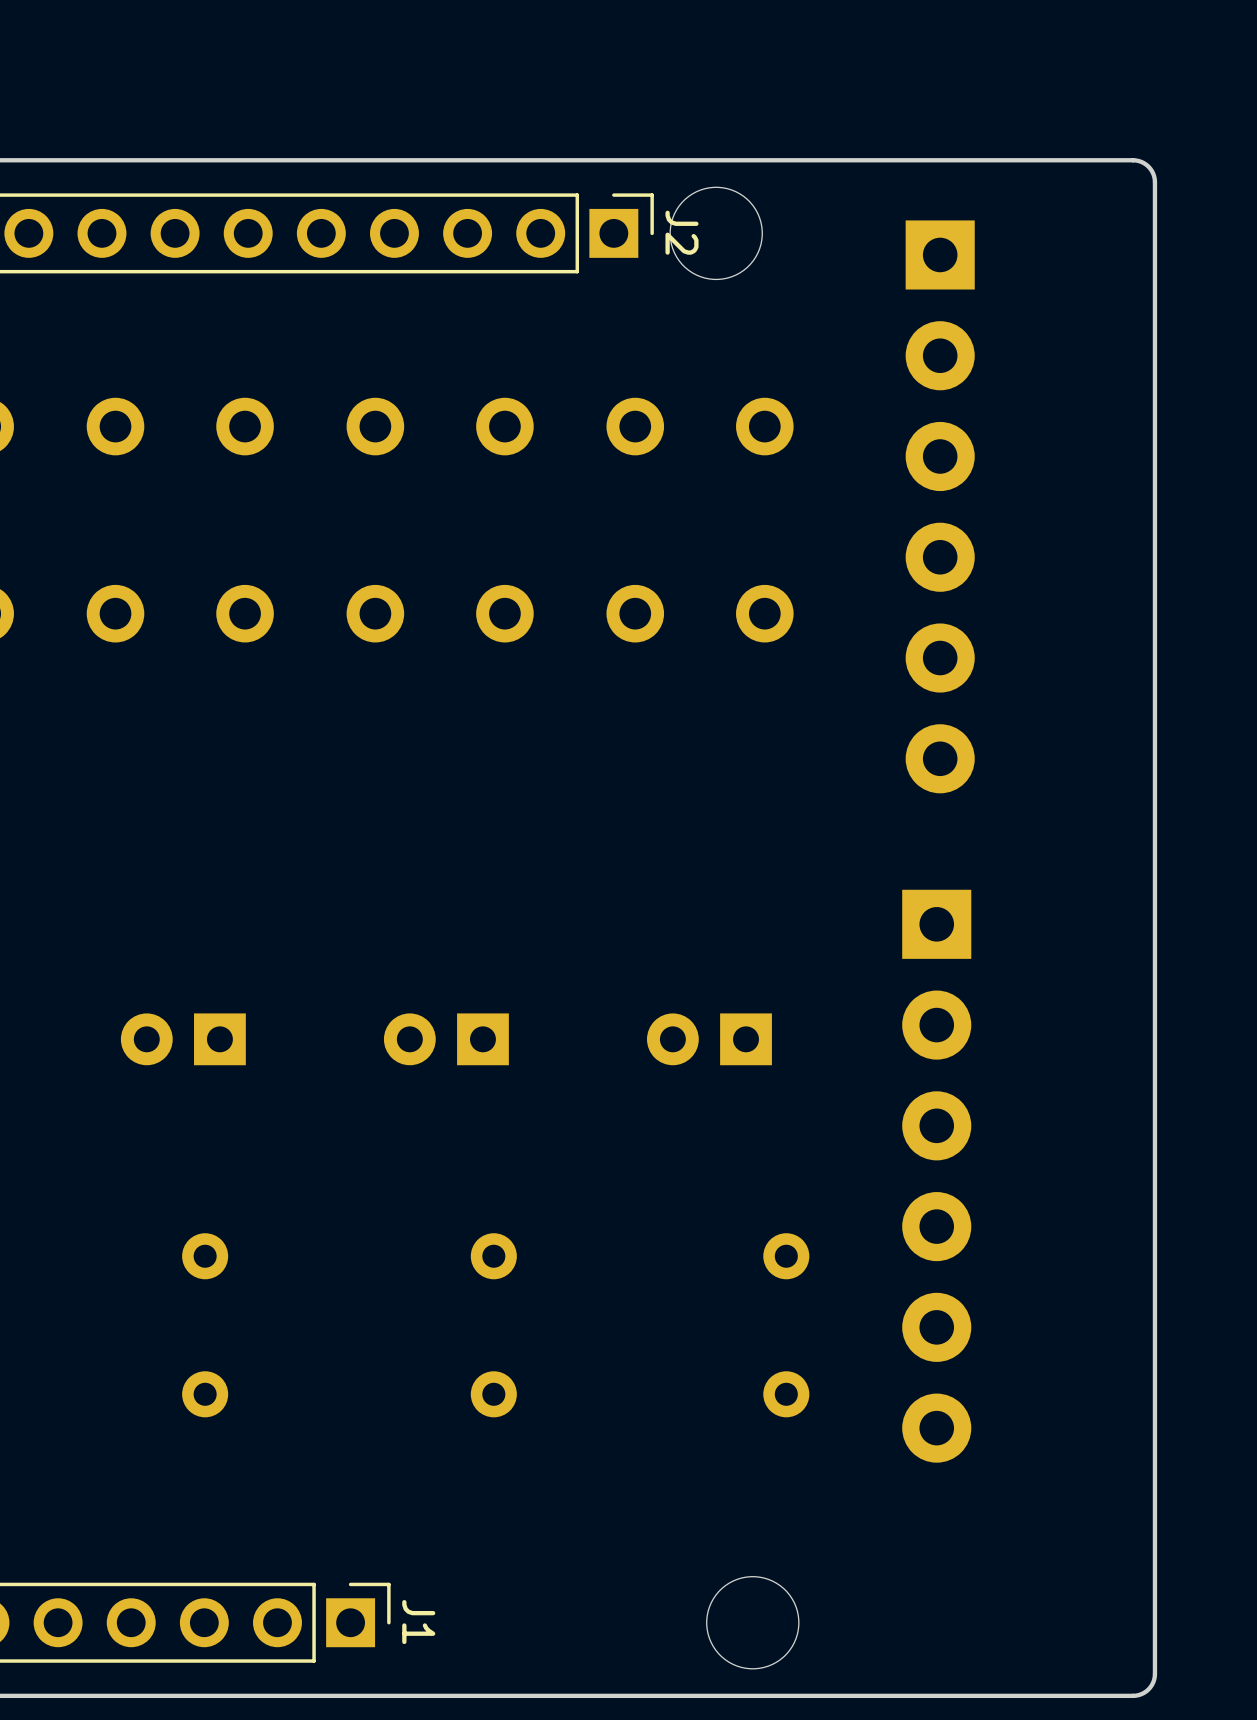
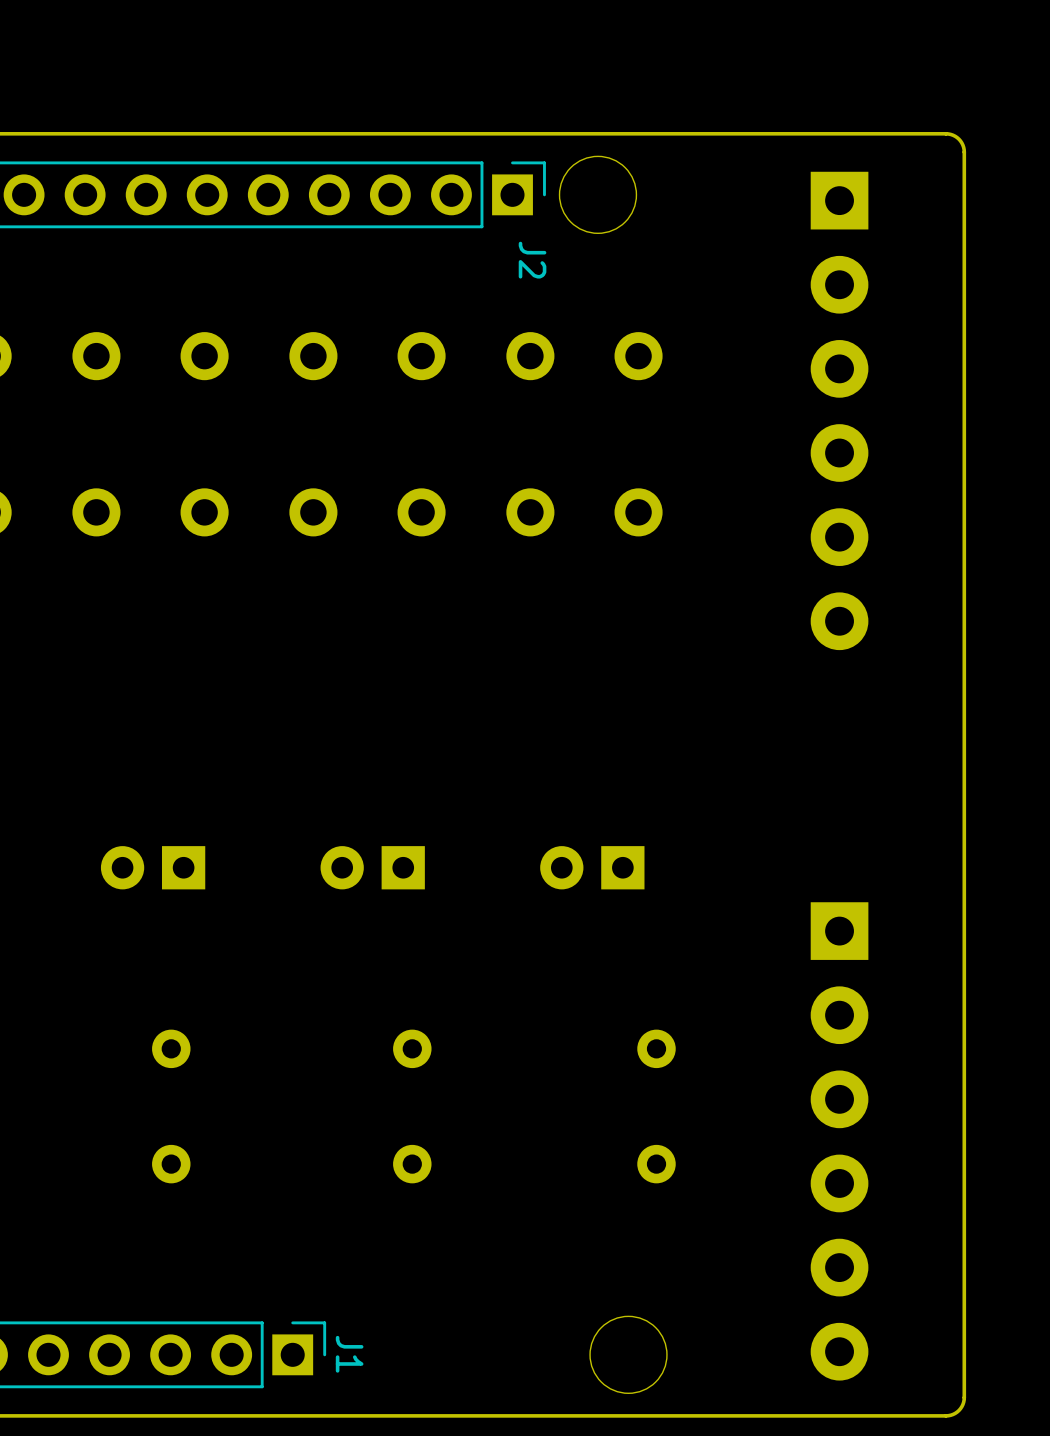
J2 name position: J2 (682, 232) -> J2 (532, 260)
part position: (940, 506) -> (839, 410)
part position: (936, 1176) -> (839, 1141)

